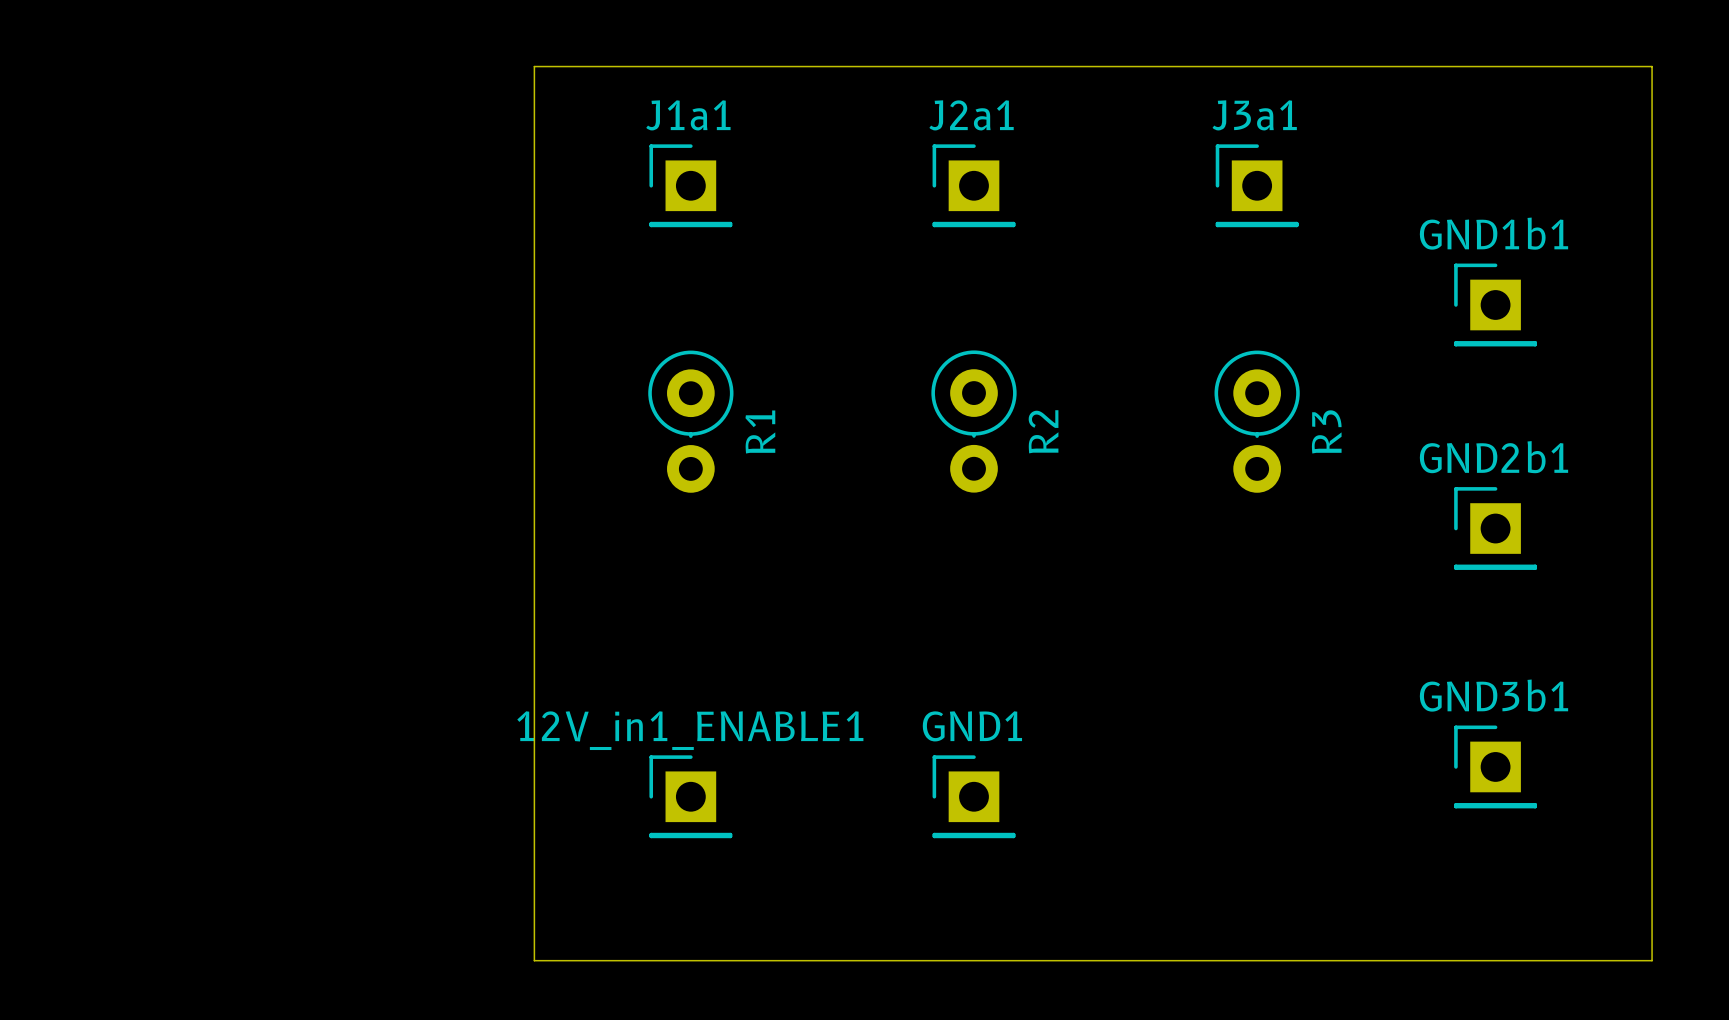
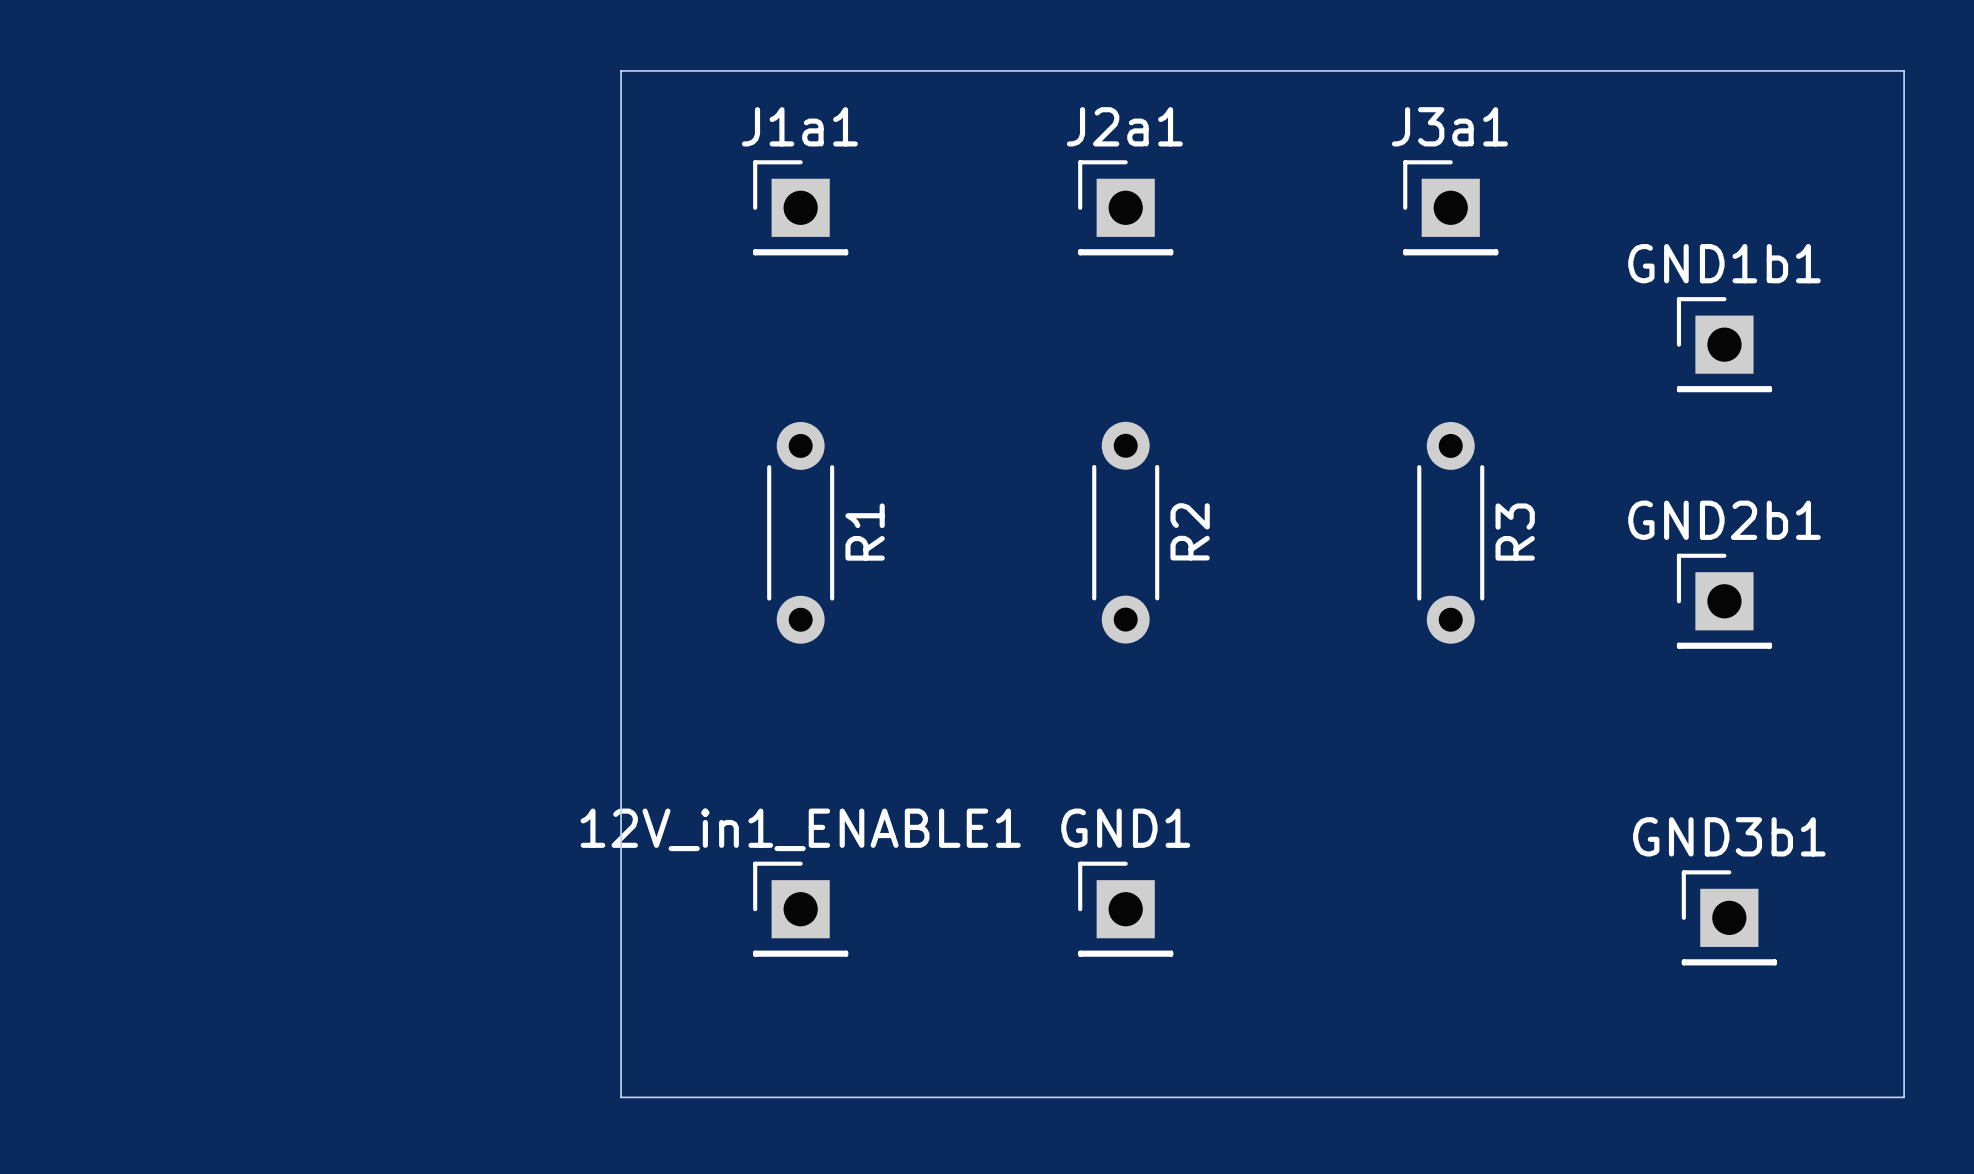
R1 footprint: [648, 350, 734, 493] -> [767, 421, 835, 644]
R2 footprint: [931, 350, 1017, 493] -> [1092, 421, 1160, 644]
R3 footprint: [1214, 350, 1300, 493] -> [1417, 421, 1485, 644]
GND3b1 position: (1495, 766) -> (1729, 917)

